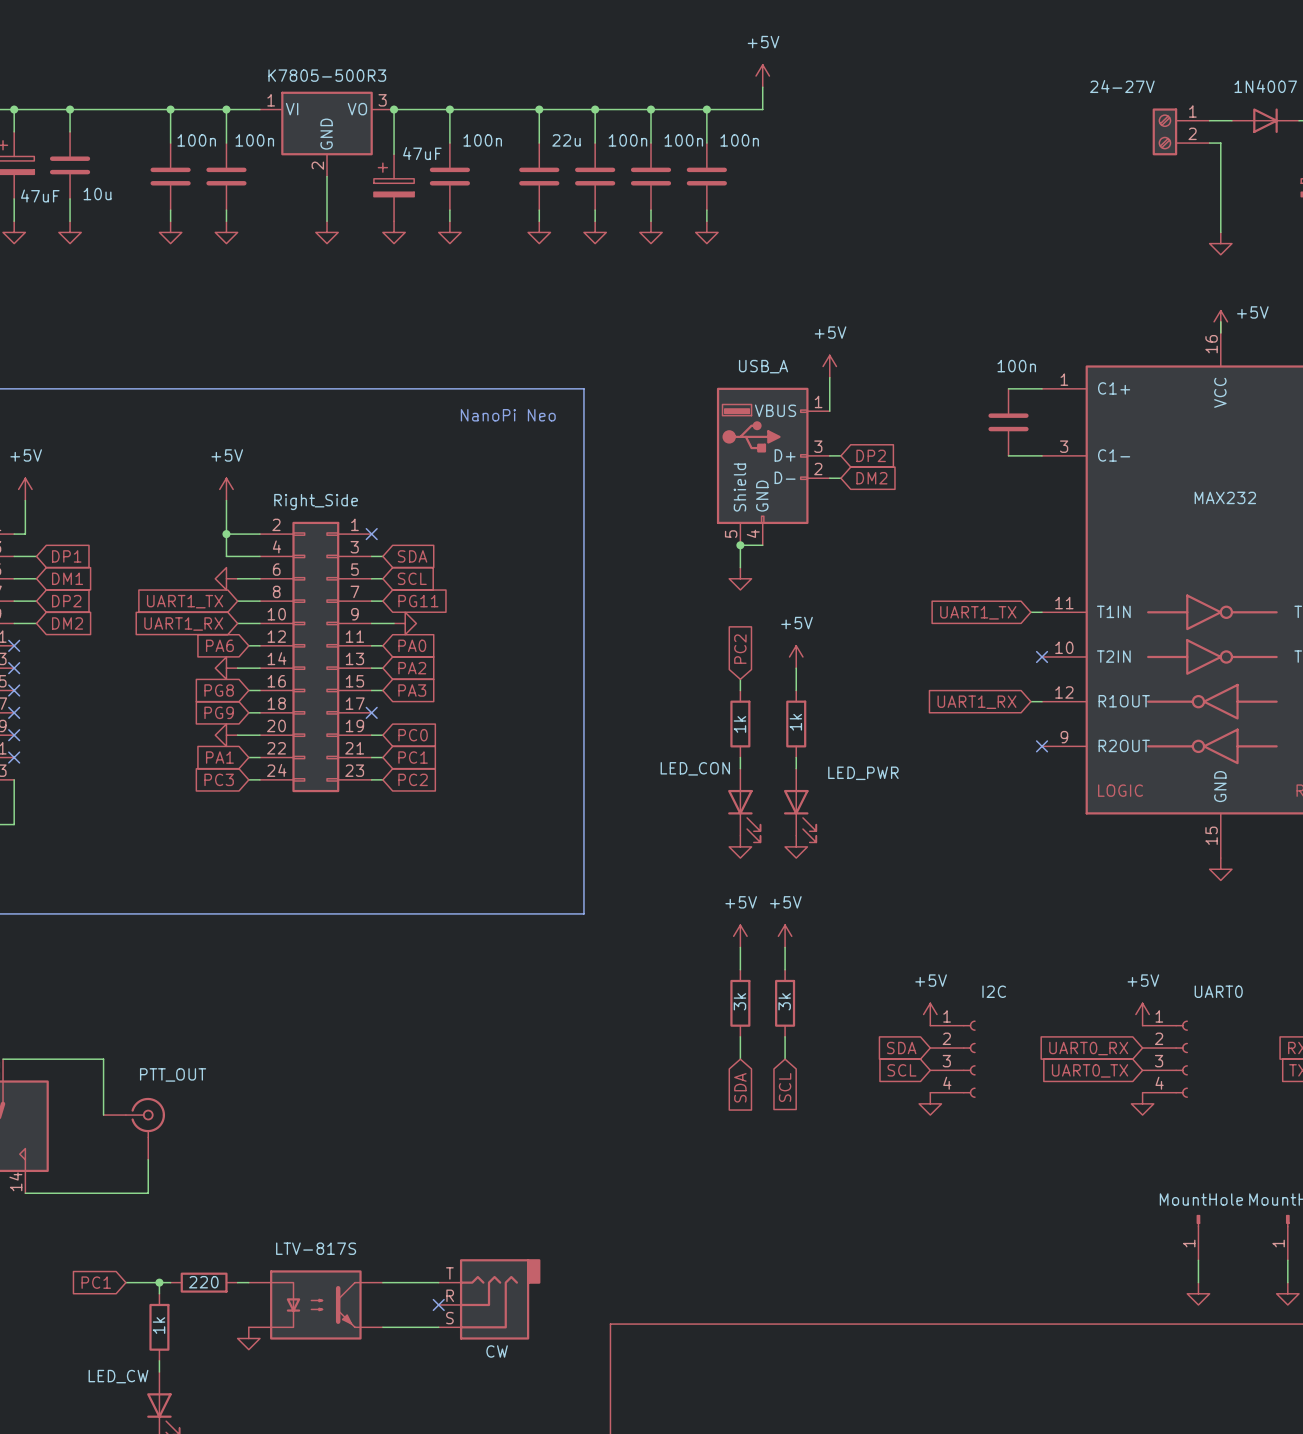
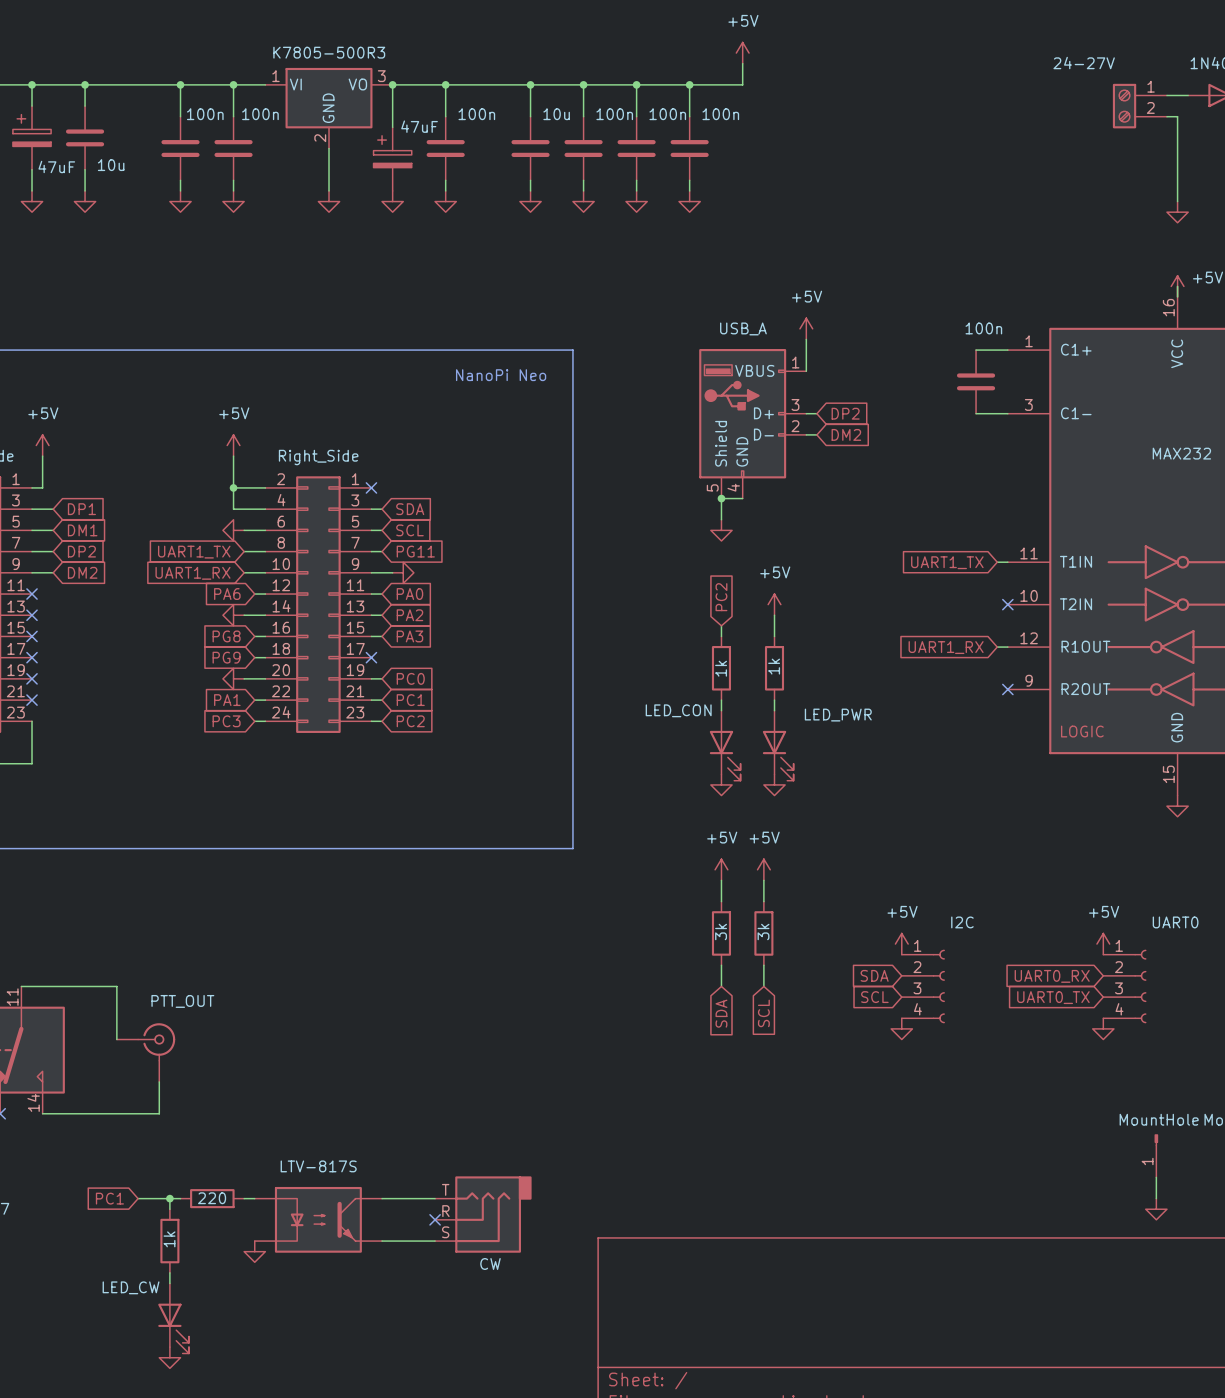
part value: 22u (566, 140) -> 10u (556, 114)

